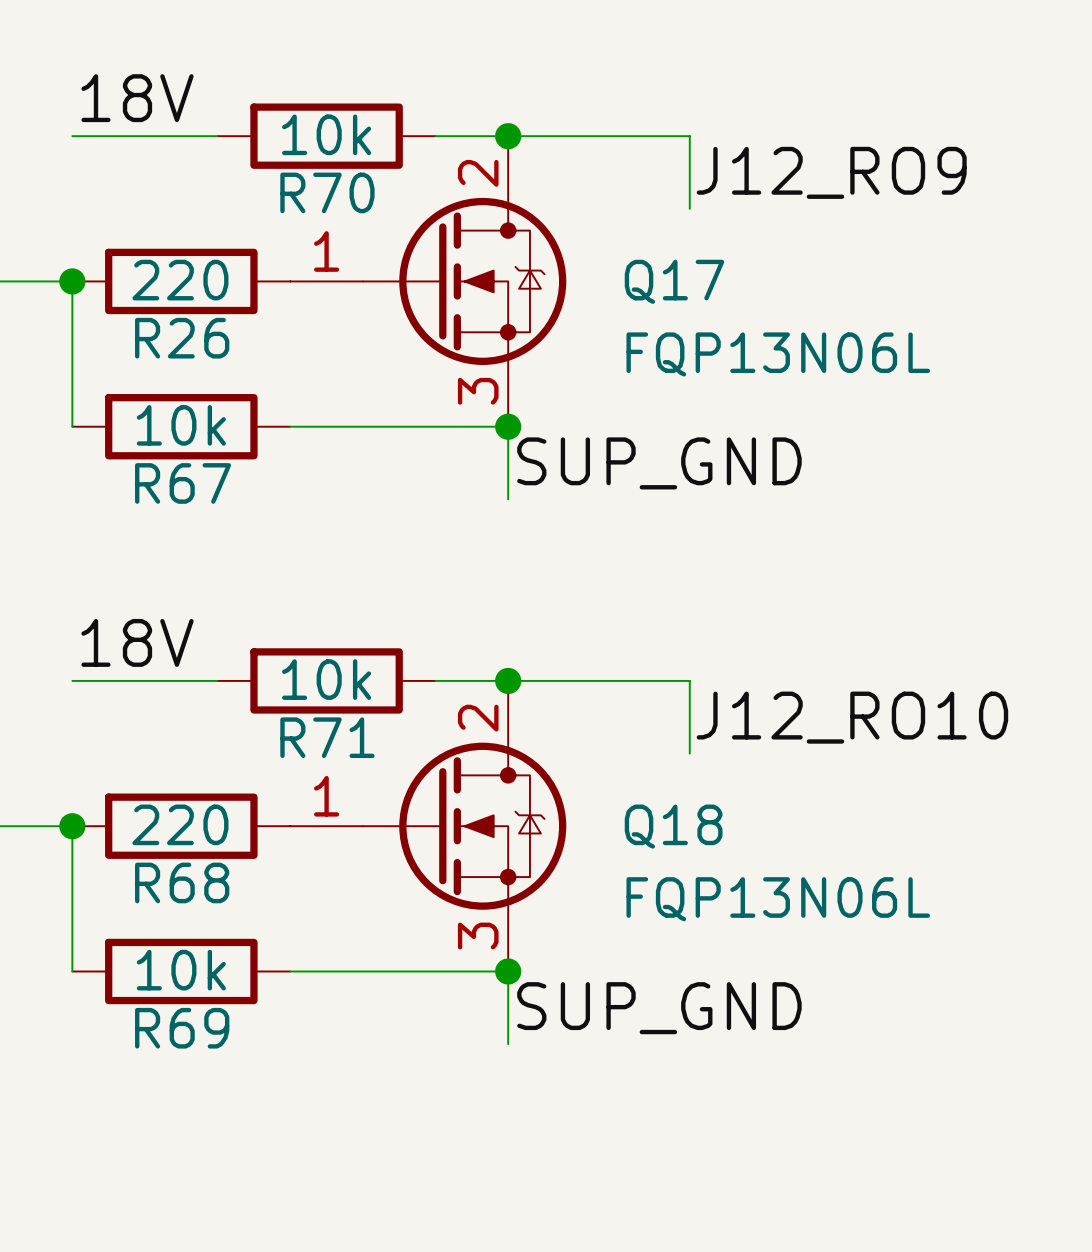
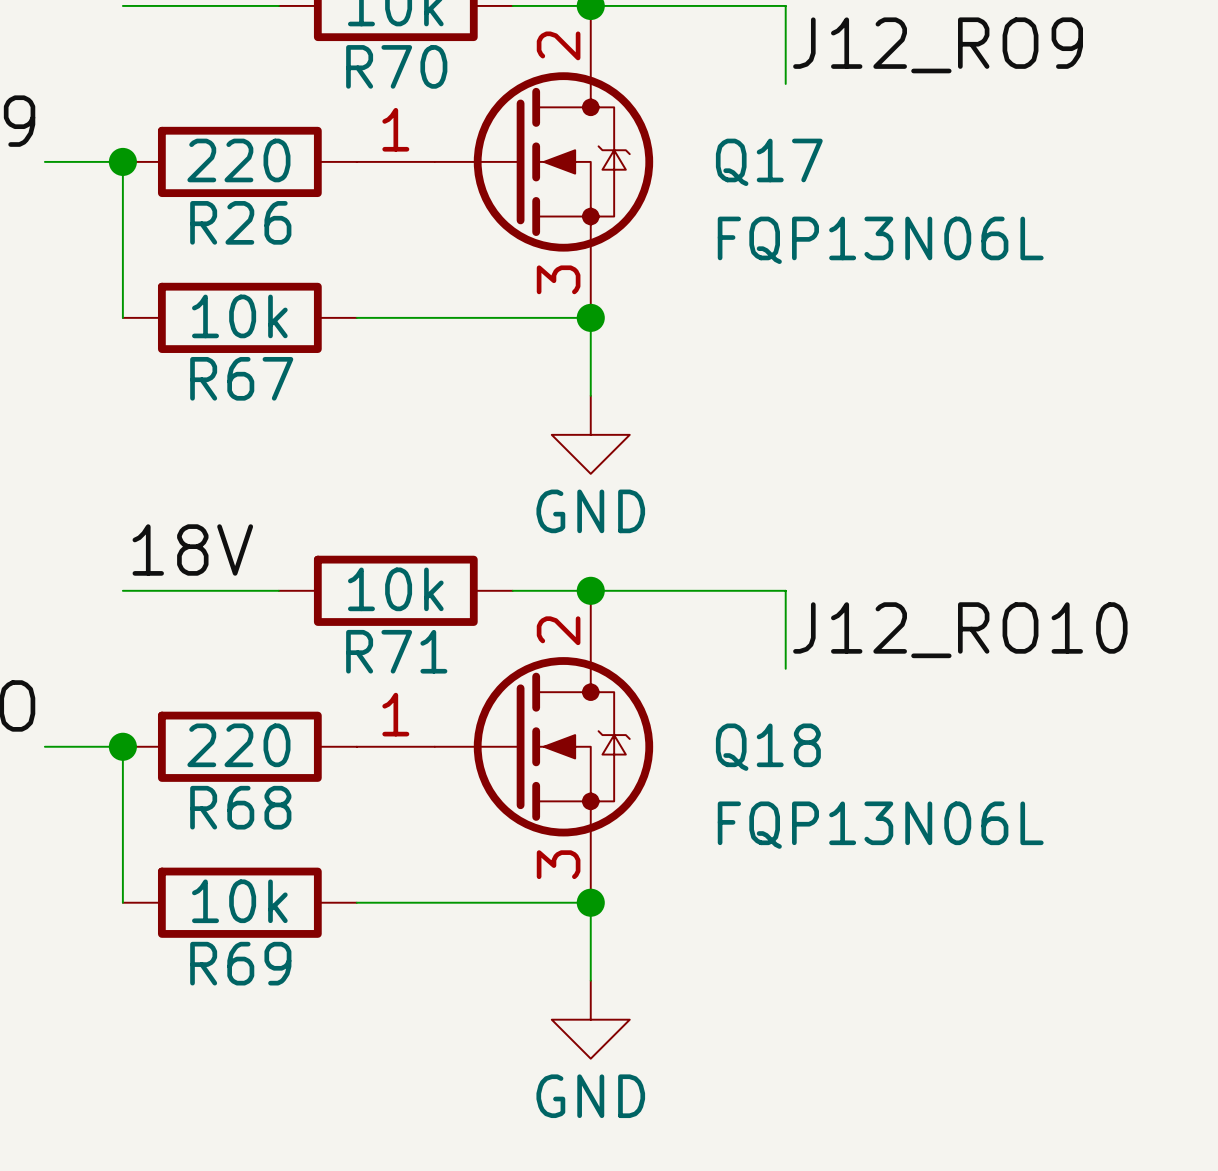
label: SUP_GND (659, 463) -> none
power symbol: none -> GND (590, 434)
label: SUP_GND (659, 1008) -> none
power symbol: none -> GND (590, 1019)

